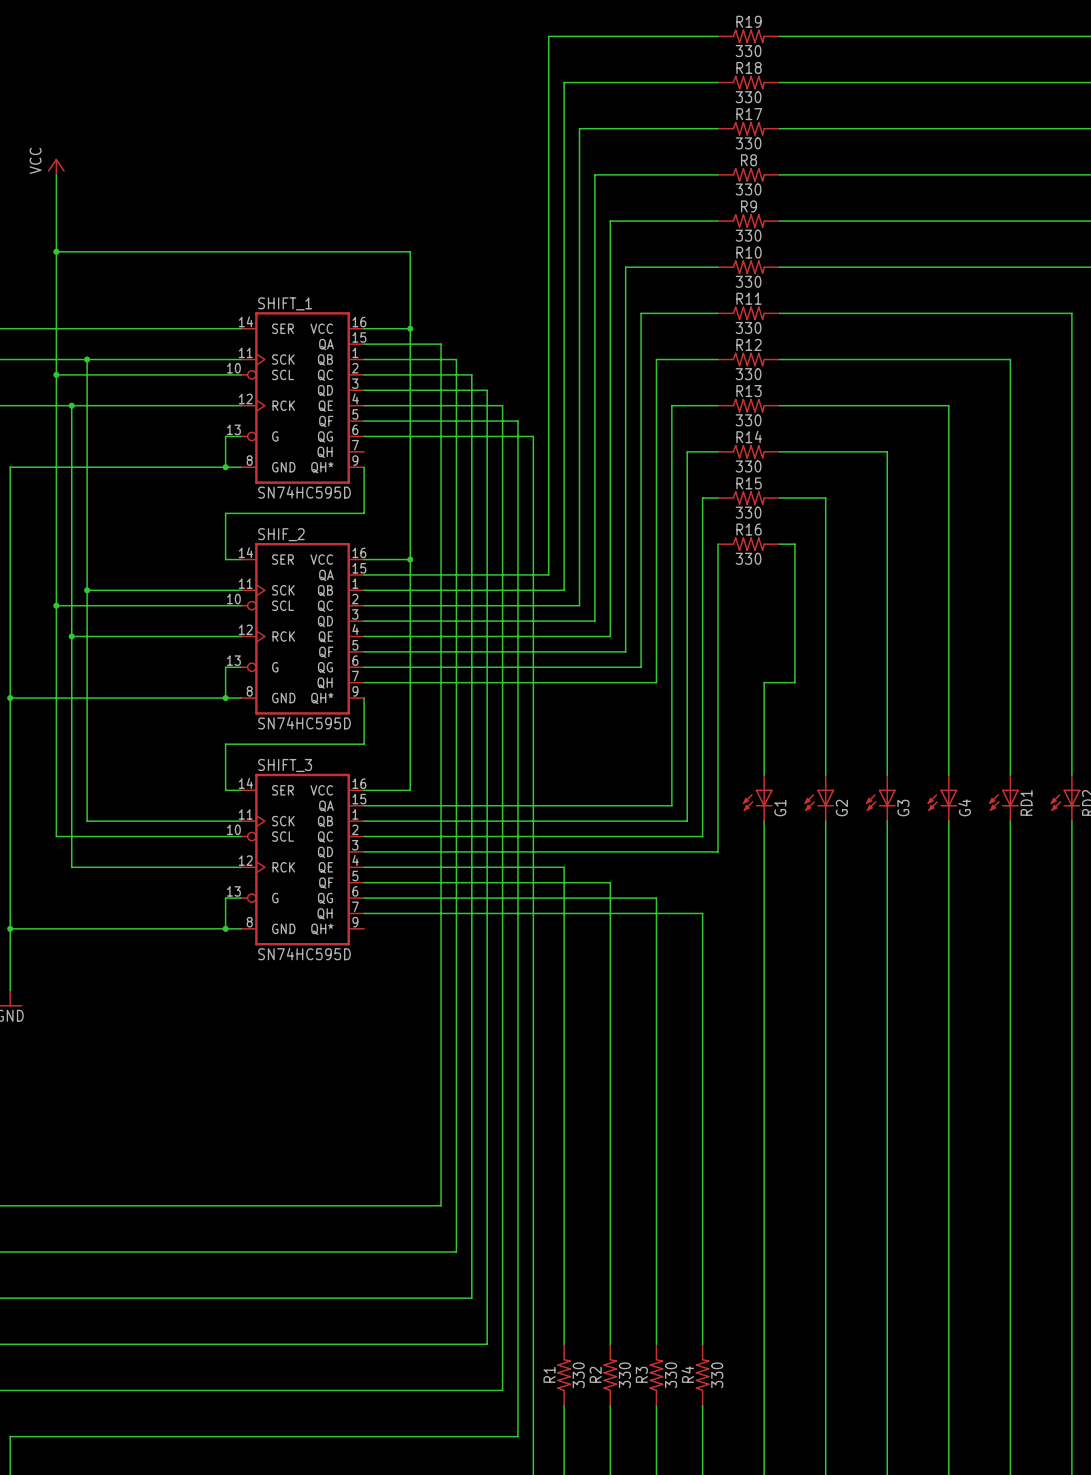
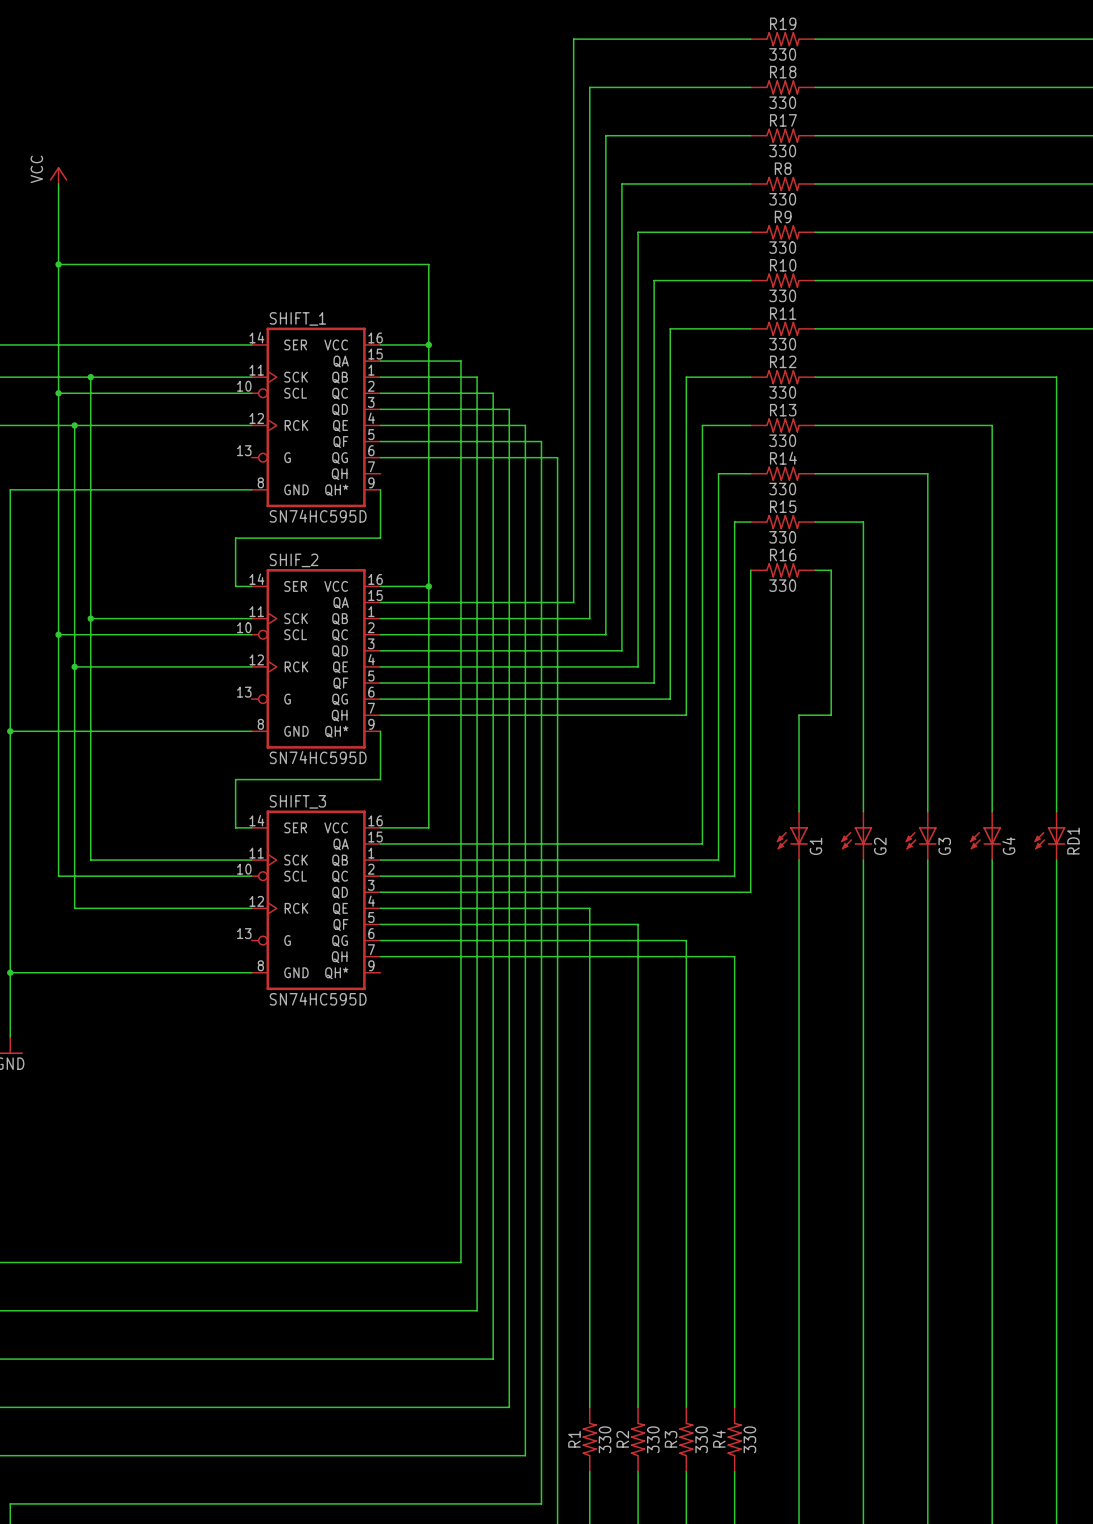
wire: (241, 436) (225, 436) (225, 467) -> none
junction: (225, 467) -> none
wire: (241, 667) (225, 667) (225, 698) -> none
junction: (225, 698) -> none
wire: (241, 898) (225, 898) (225, 928) -> none
junction: (225, 928) -> none

